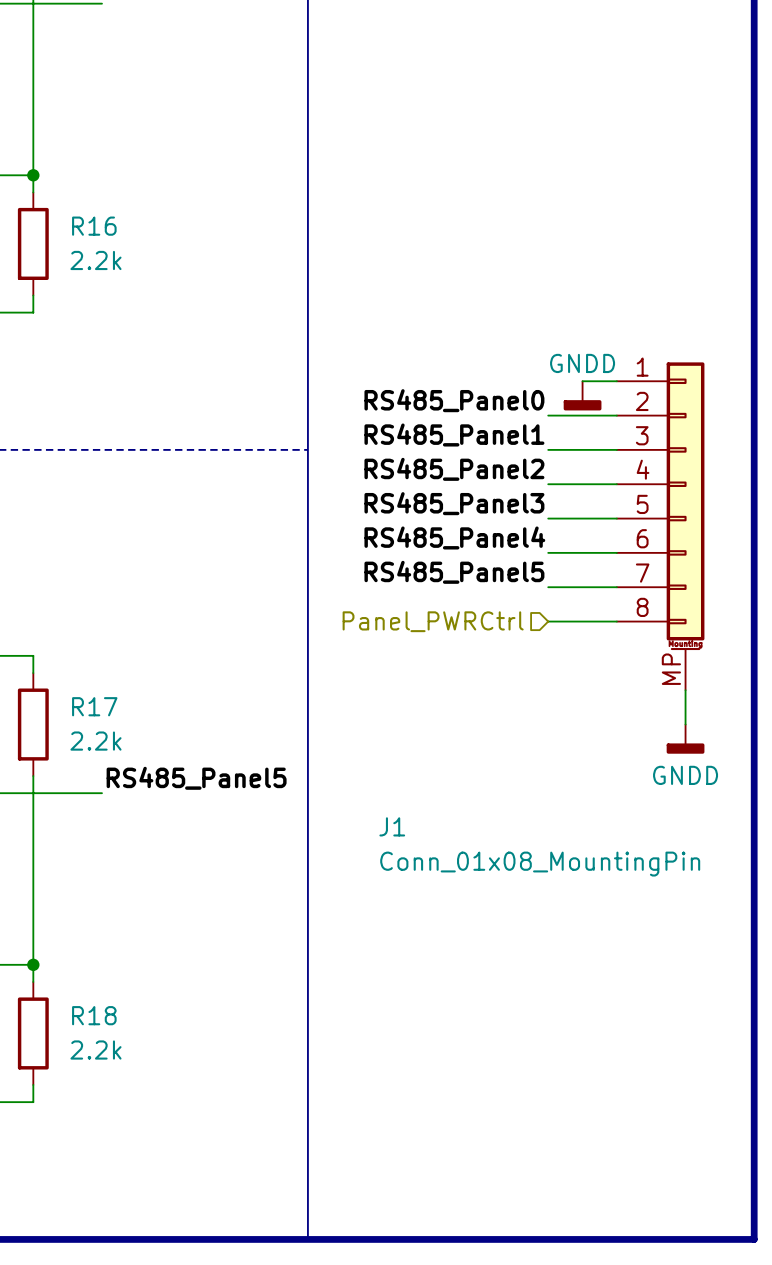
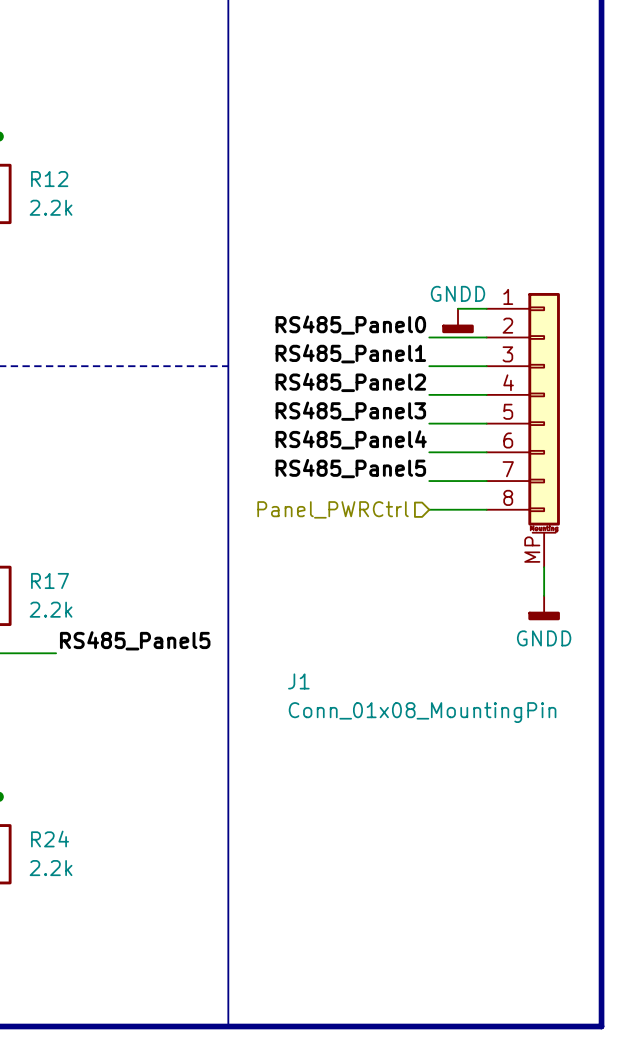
R16 name: R16 (94, 226) -> R12 (49, 179)
R18 name: R18 (94, 1015) -> R24 (50, 839)

